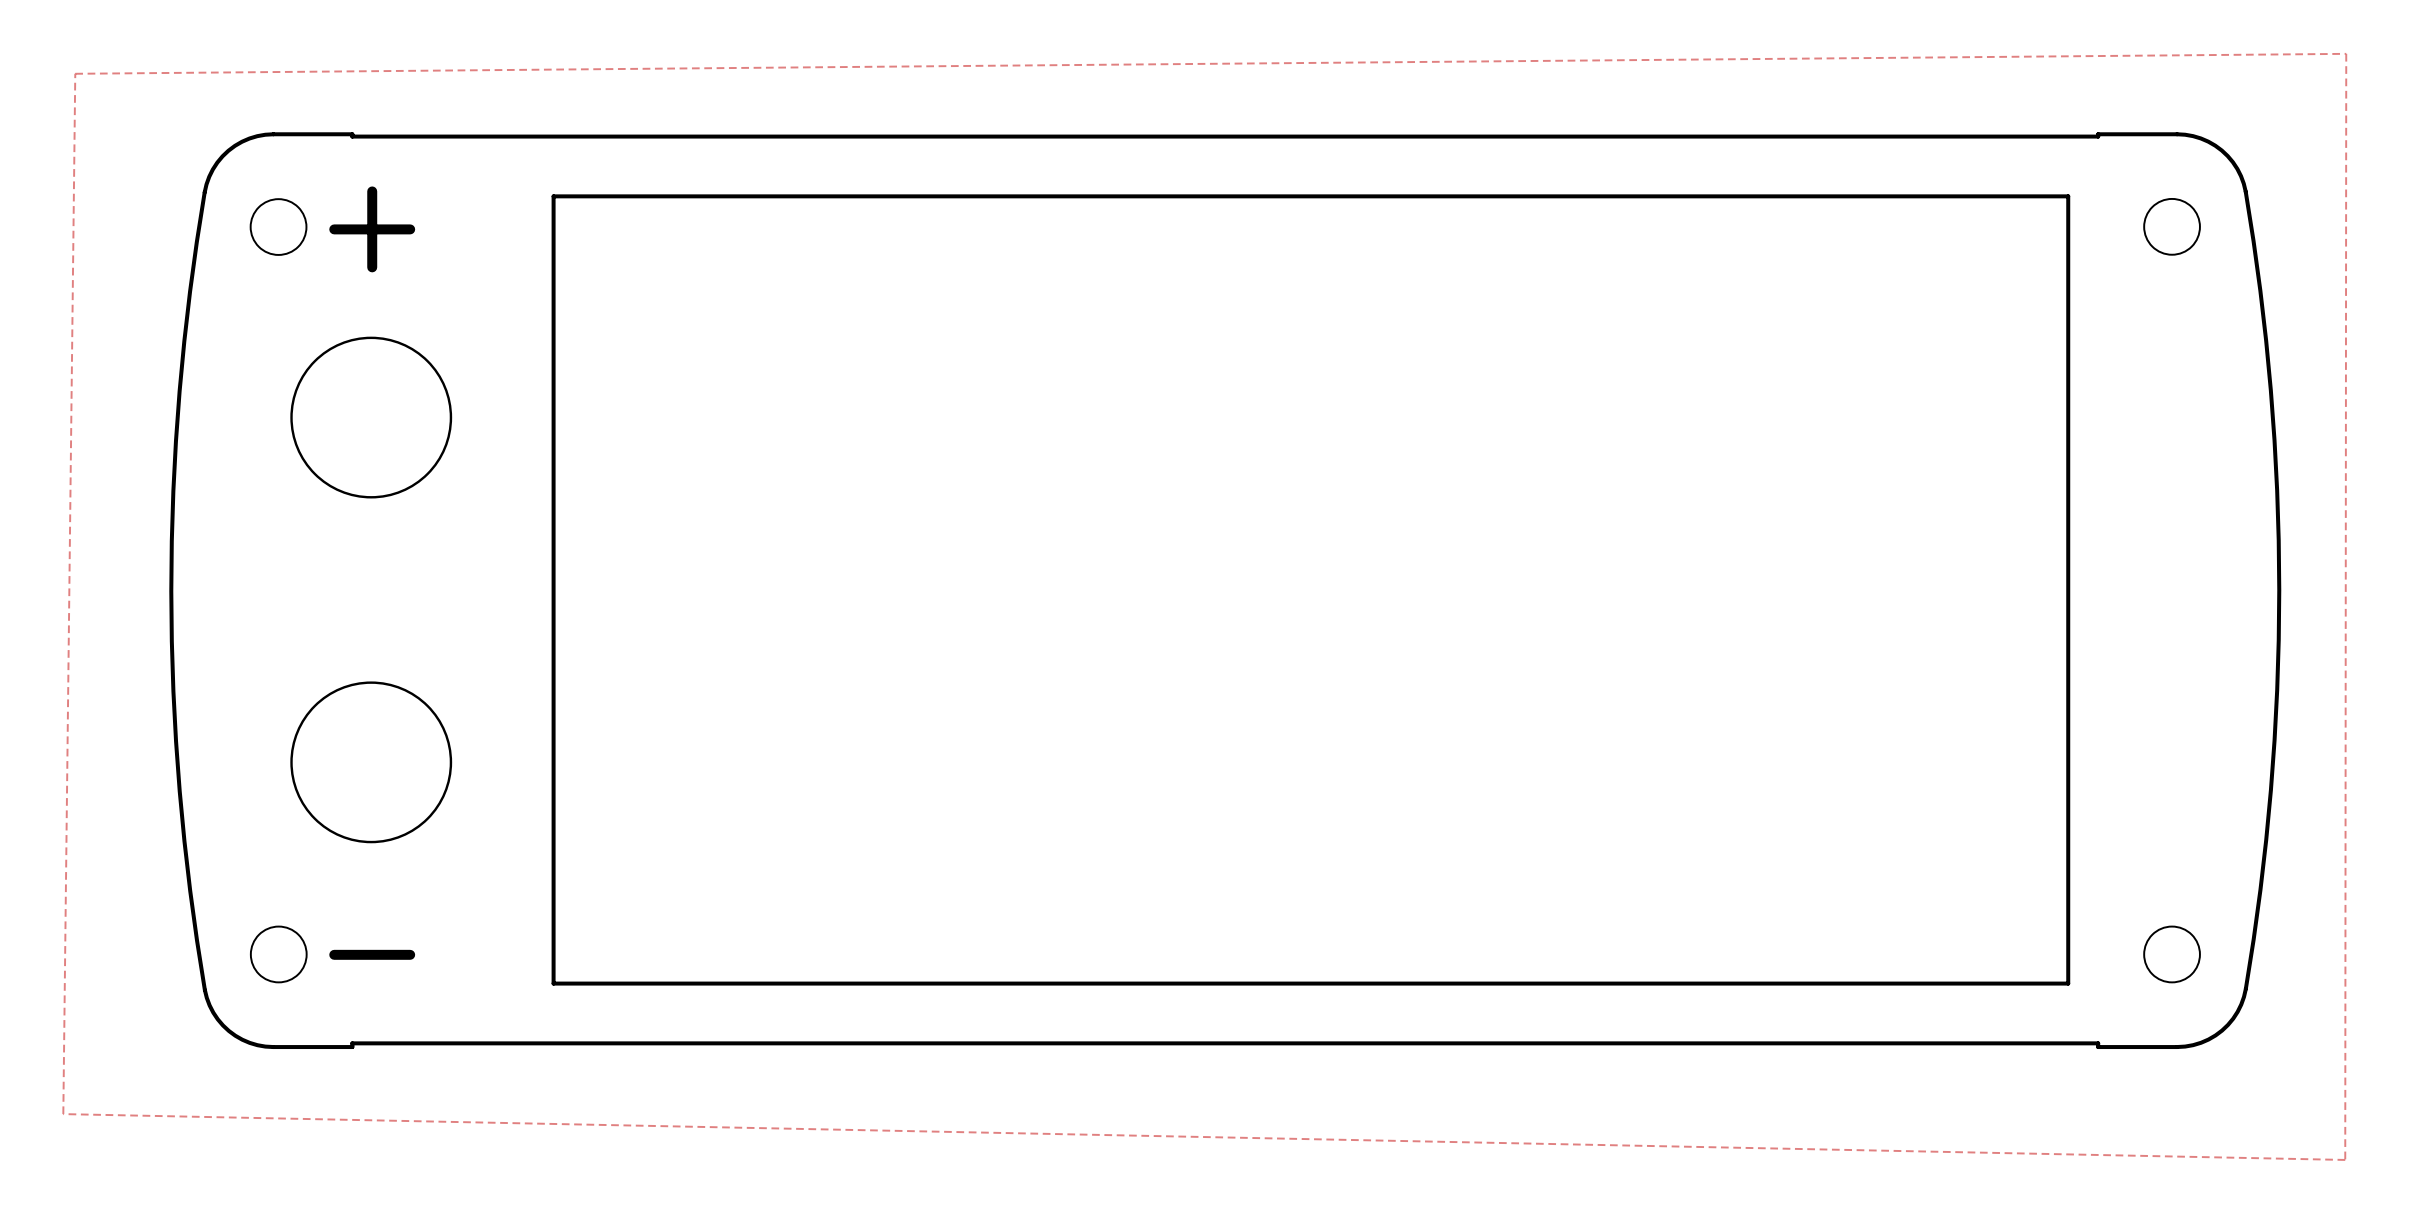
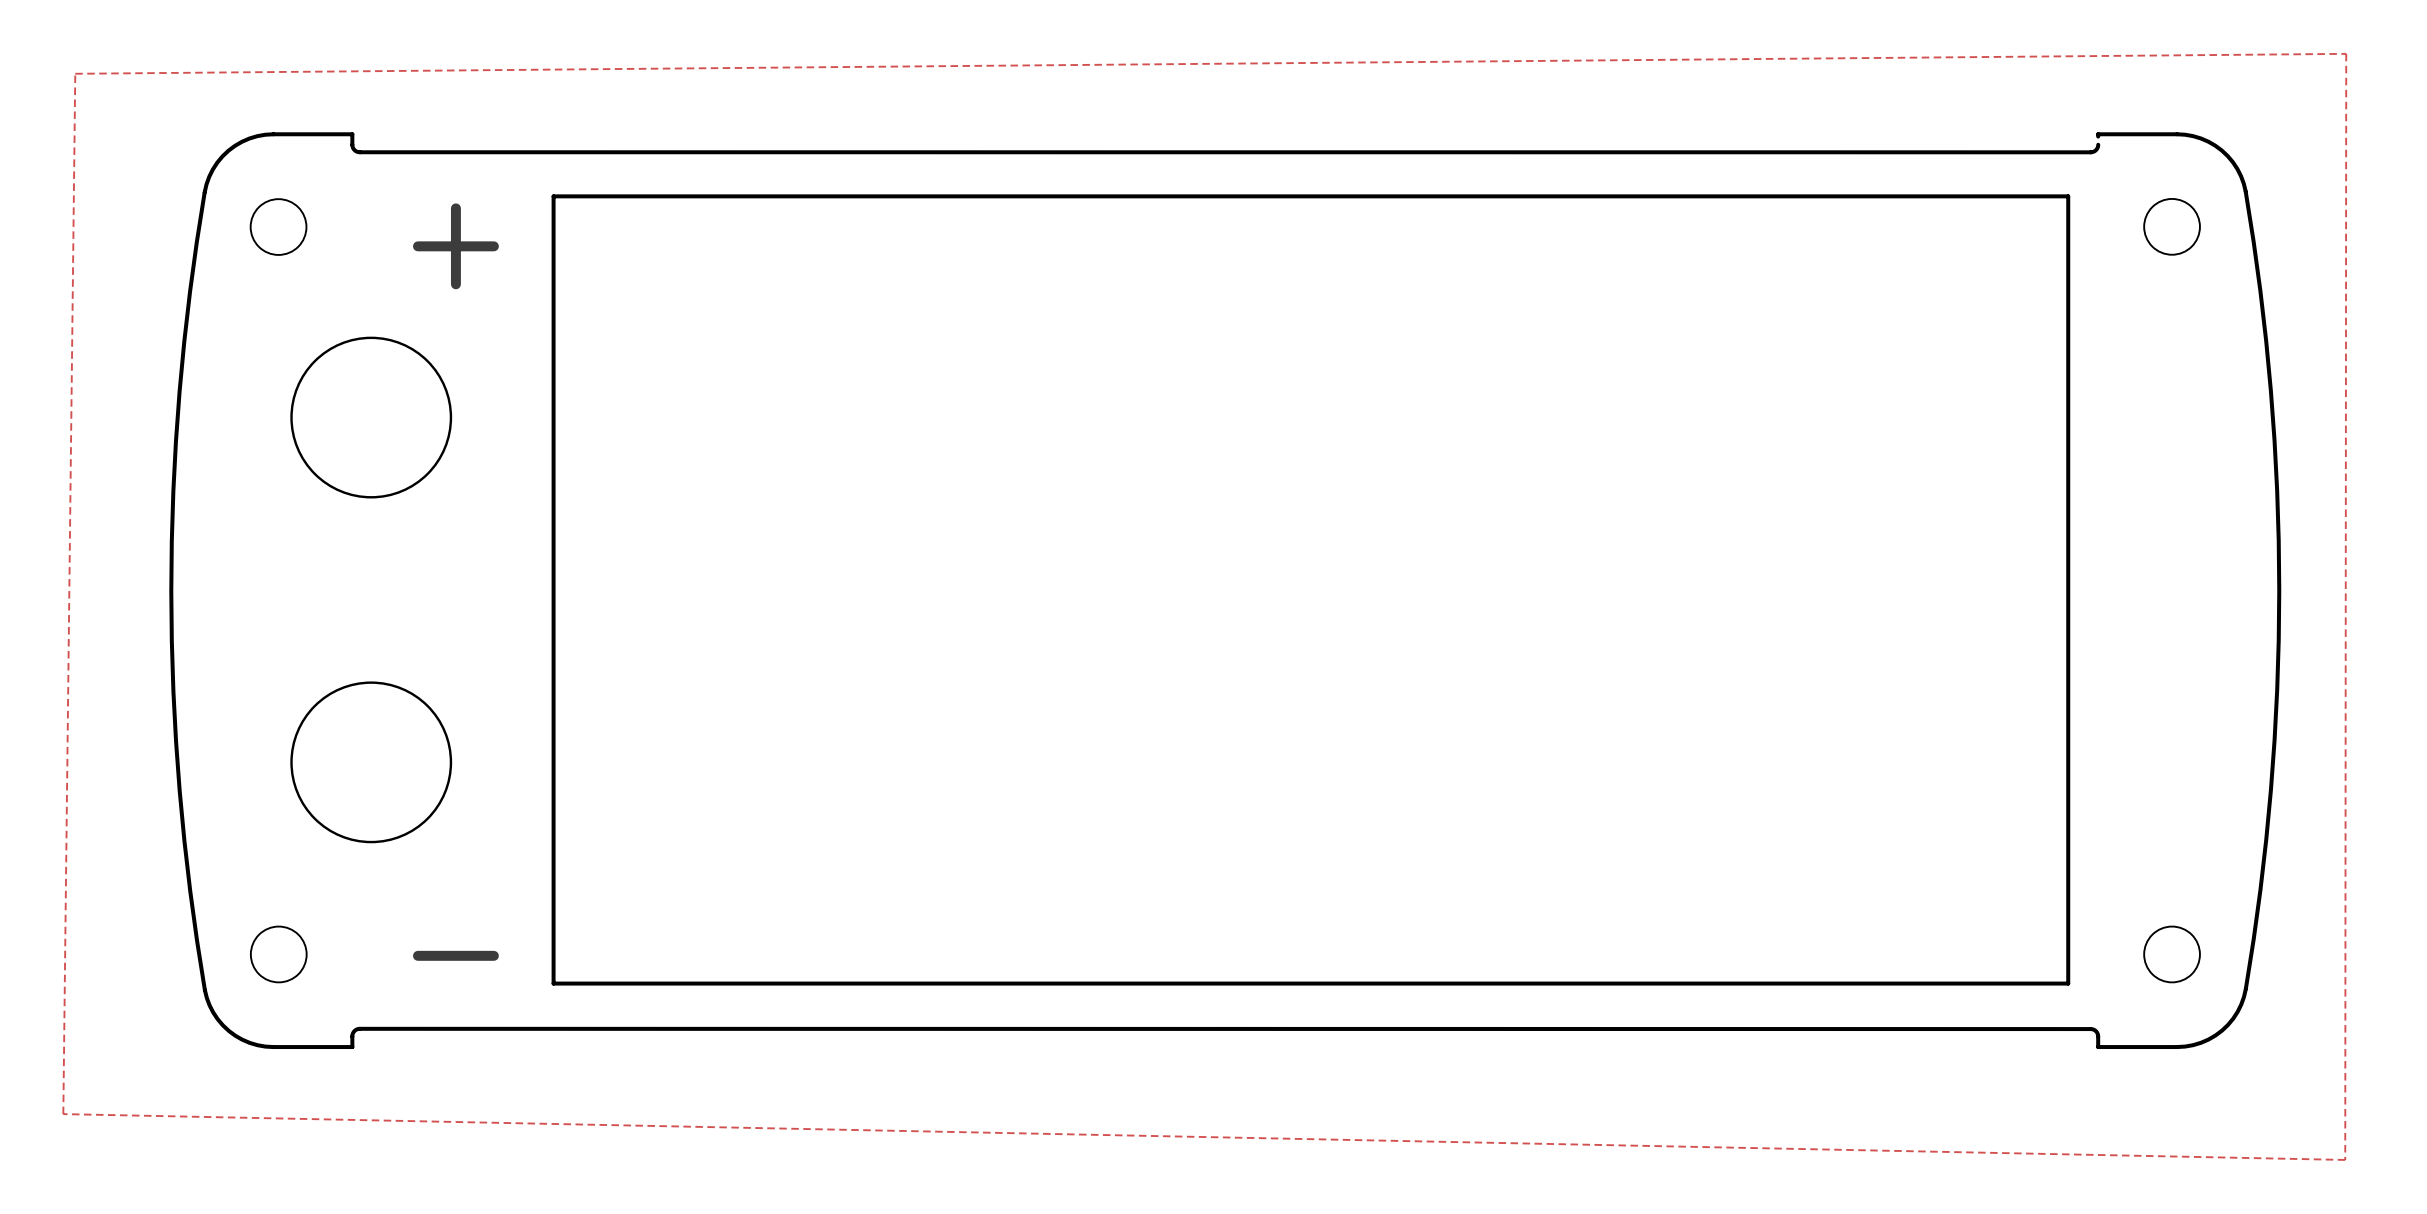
board edge: (352, 136) (2098, 136) -> (352, 136) (353, 148) (360, 152) (2090, 152) (2096, 150) (2098, 144)
text position: + (372, 229) -> + (455, 246)
text position: - (372, 954) -> - (455, 955)
board edge: (352, 1043) (2098, 1043) -> (352, 1043) (353, 1033) (359, 1028) (2090, 1029) (2097, 1033) (2098, 1043)

